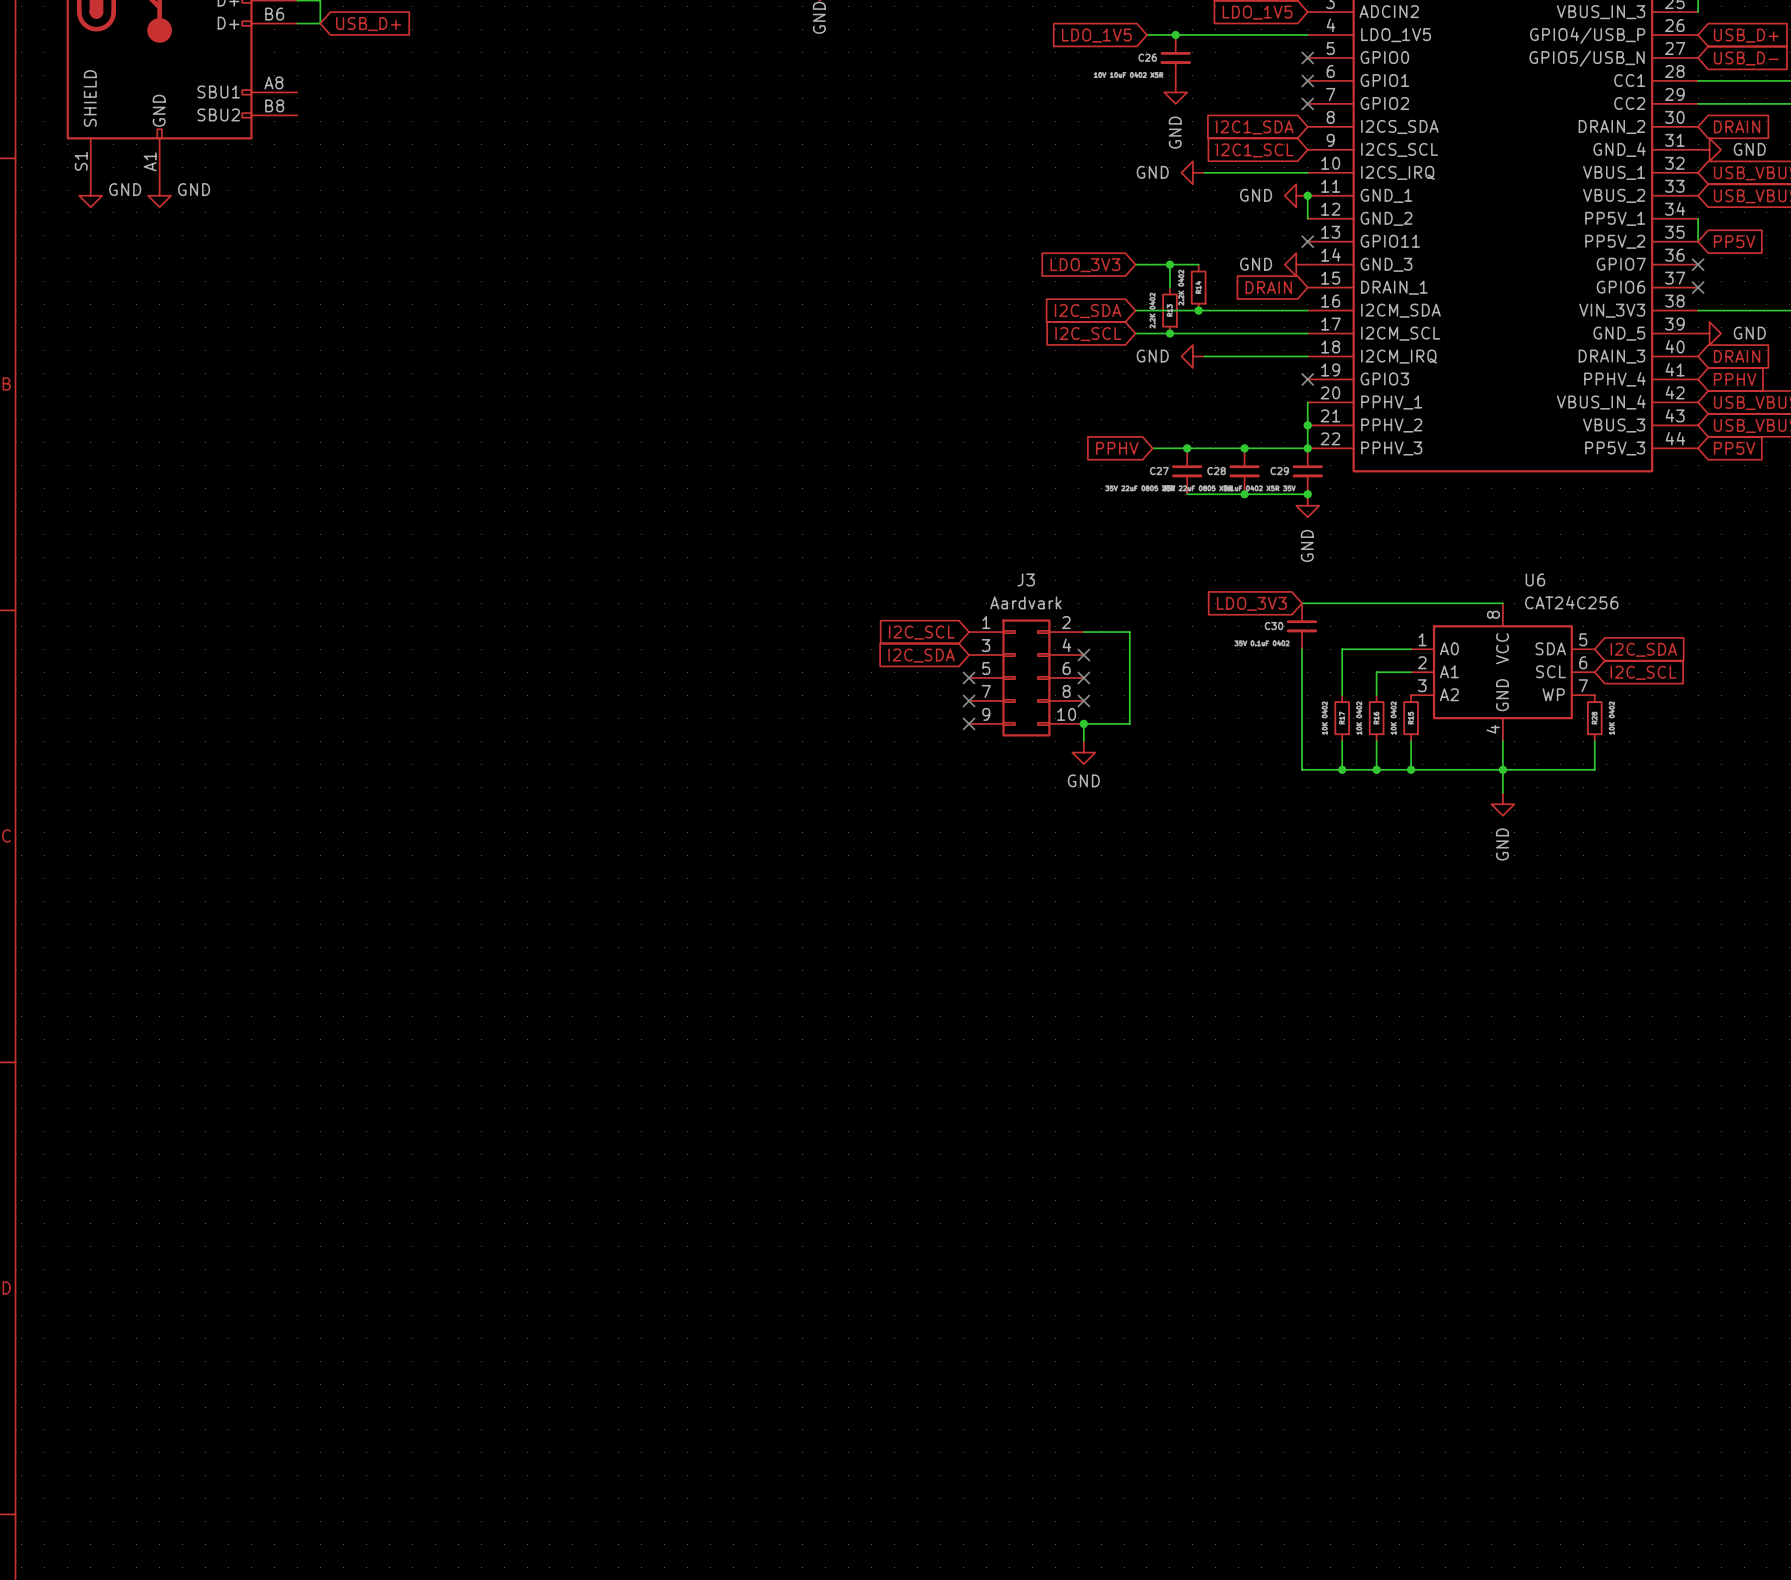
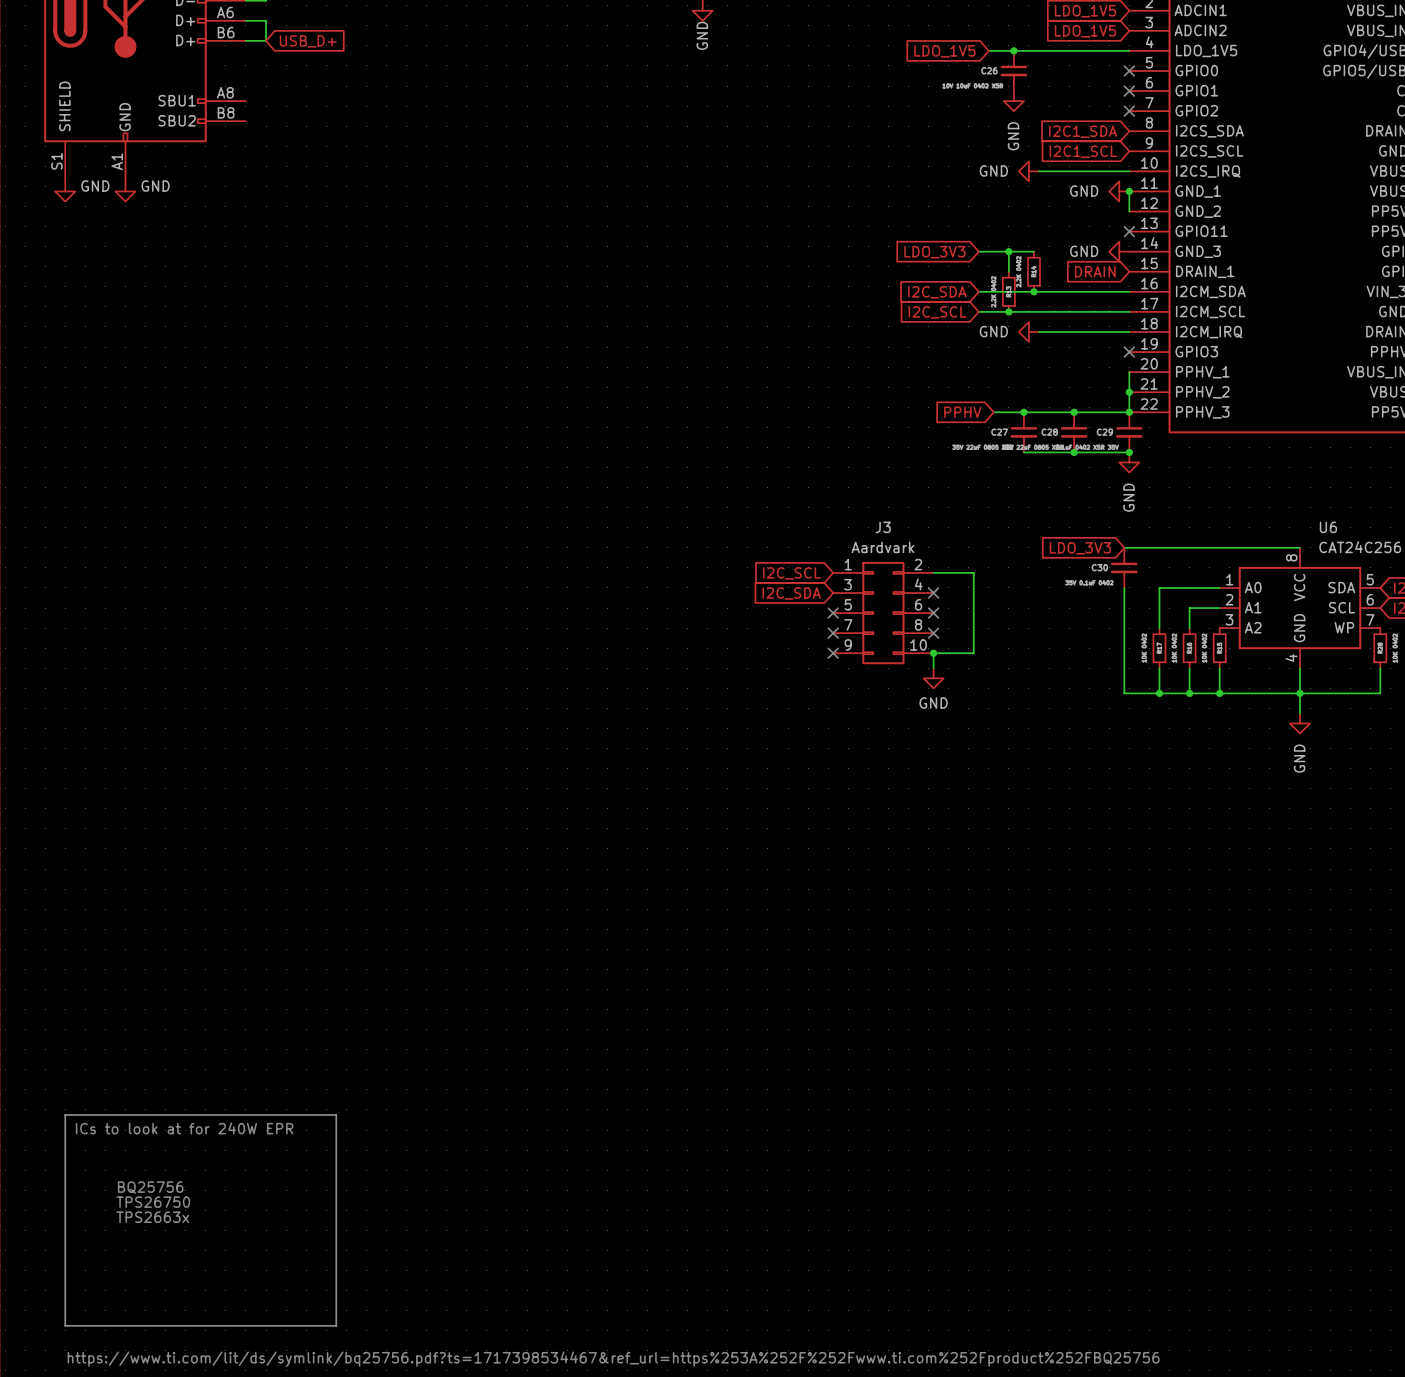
line: none -> (65, 1115) (336, 1115) (336, 1325) (65, 1325) (65, 1115)
text: none -> ICs to look at for 240W EPR (184, 1128)
text: none -> BQ25756 (150, 1187)
text: none -> TPS26750 (153, 1202)
text: none -> TPS2663x (152, 1217)
text: none -> https://www.ti.com/lit/ds/symlink/bq25756.pdf?ts=1717398534467&ref_url=https%253A%252F%252Fwww.ti.com%252Fproduct%252FBQ25756 (613, 1359)

